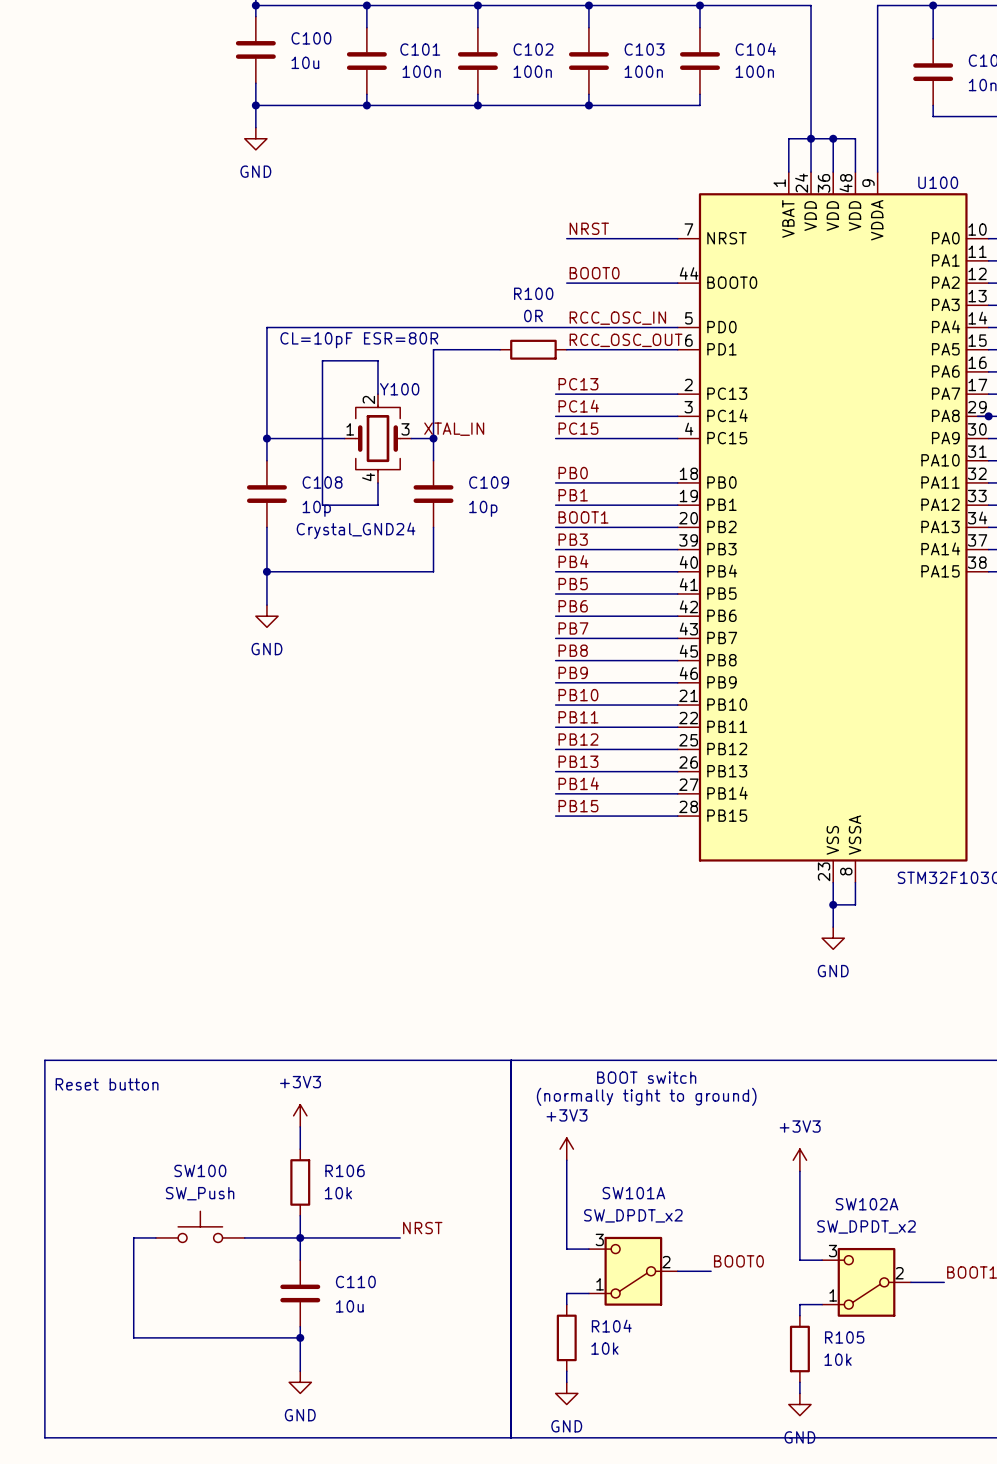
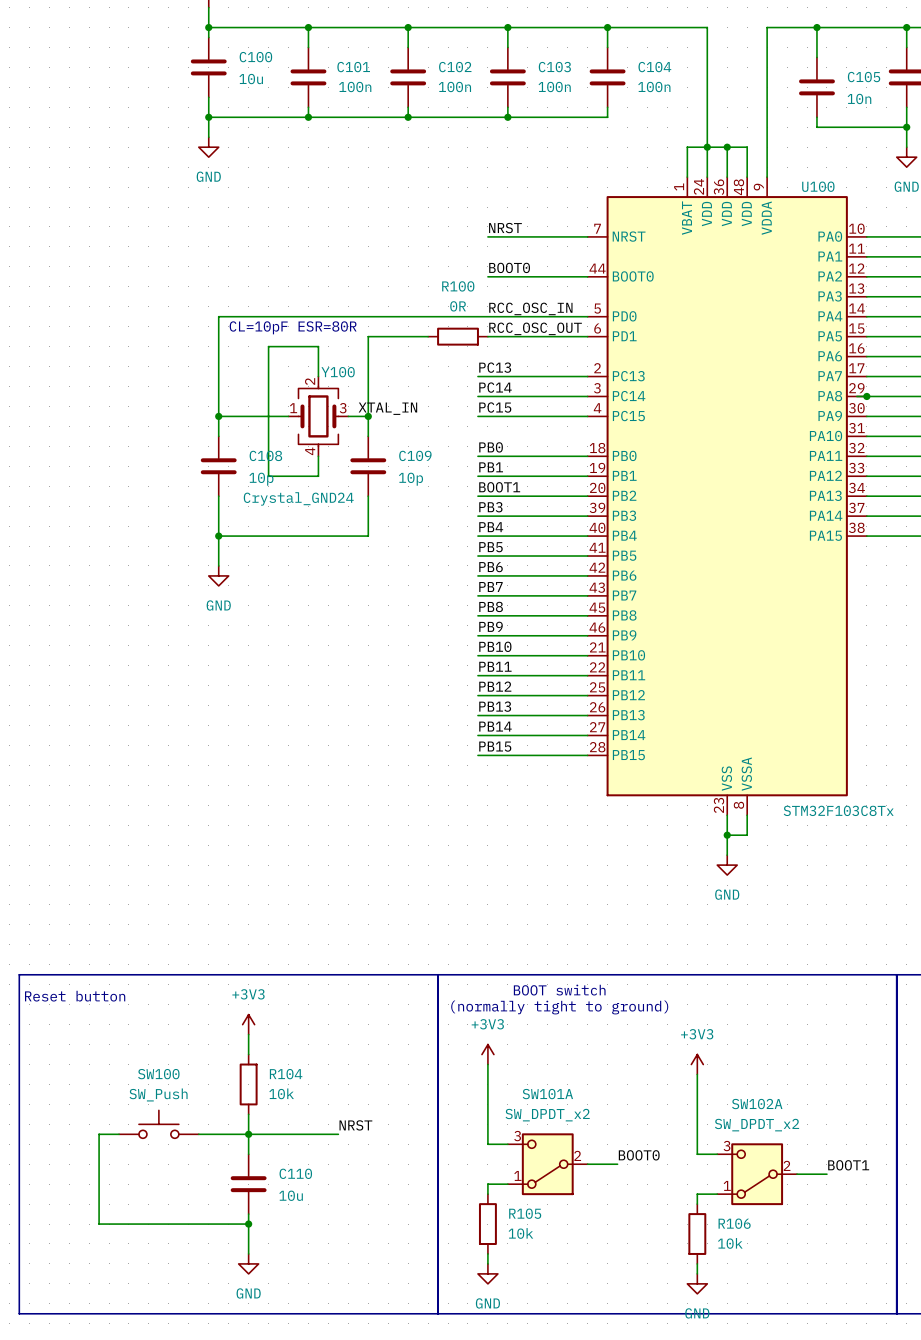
R106 name: R106 (345, 1170) -> R104 (286, 1074)
R104 name: R104 (611, 1326) -> R105 (525, 1213)
R105 name: R105 (844, 1337) -> R106 (734, 1223)

